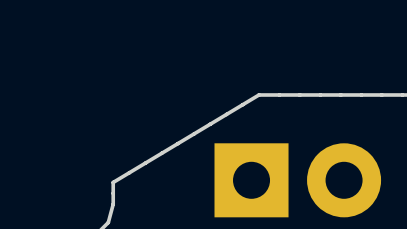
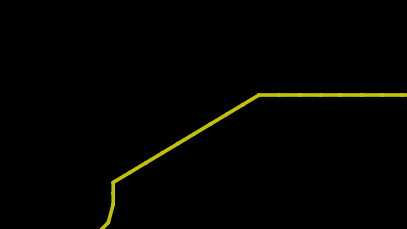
part: (297, 180) -> none

